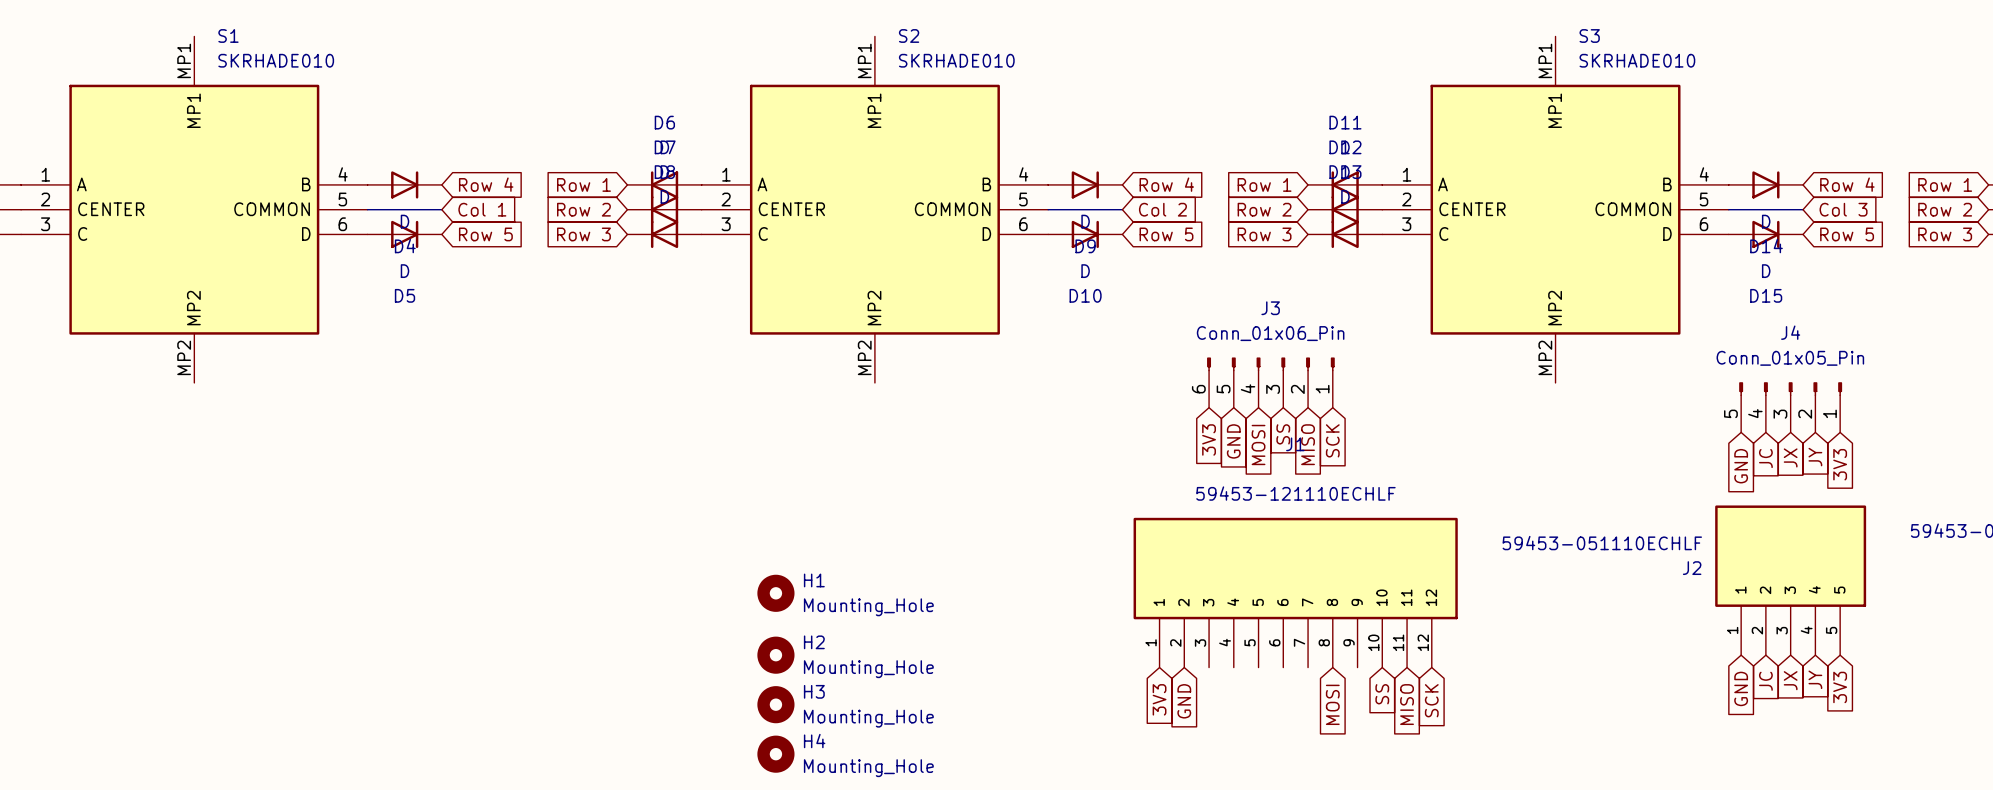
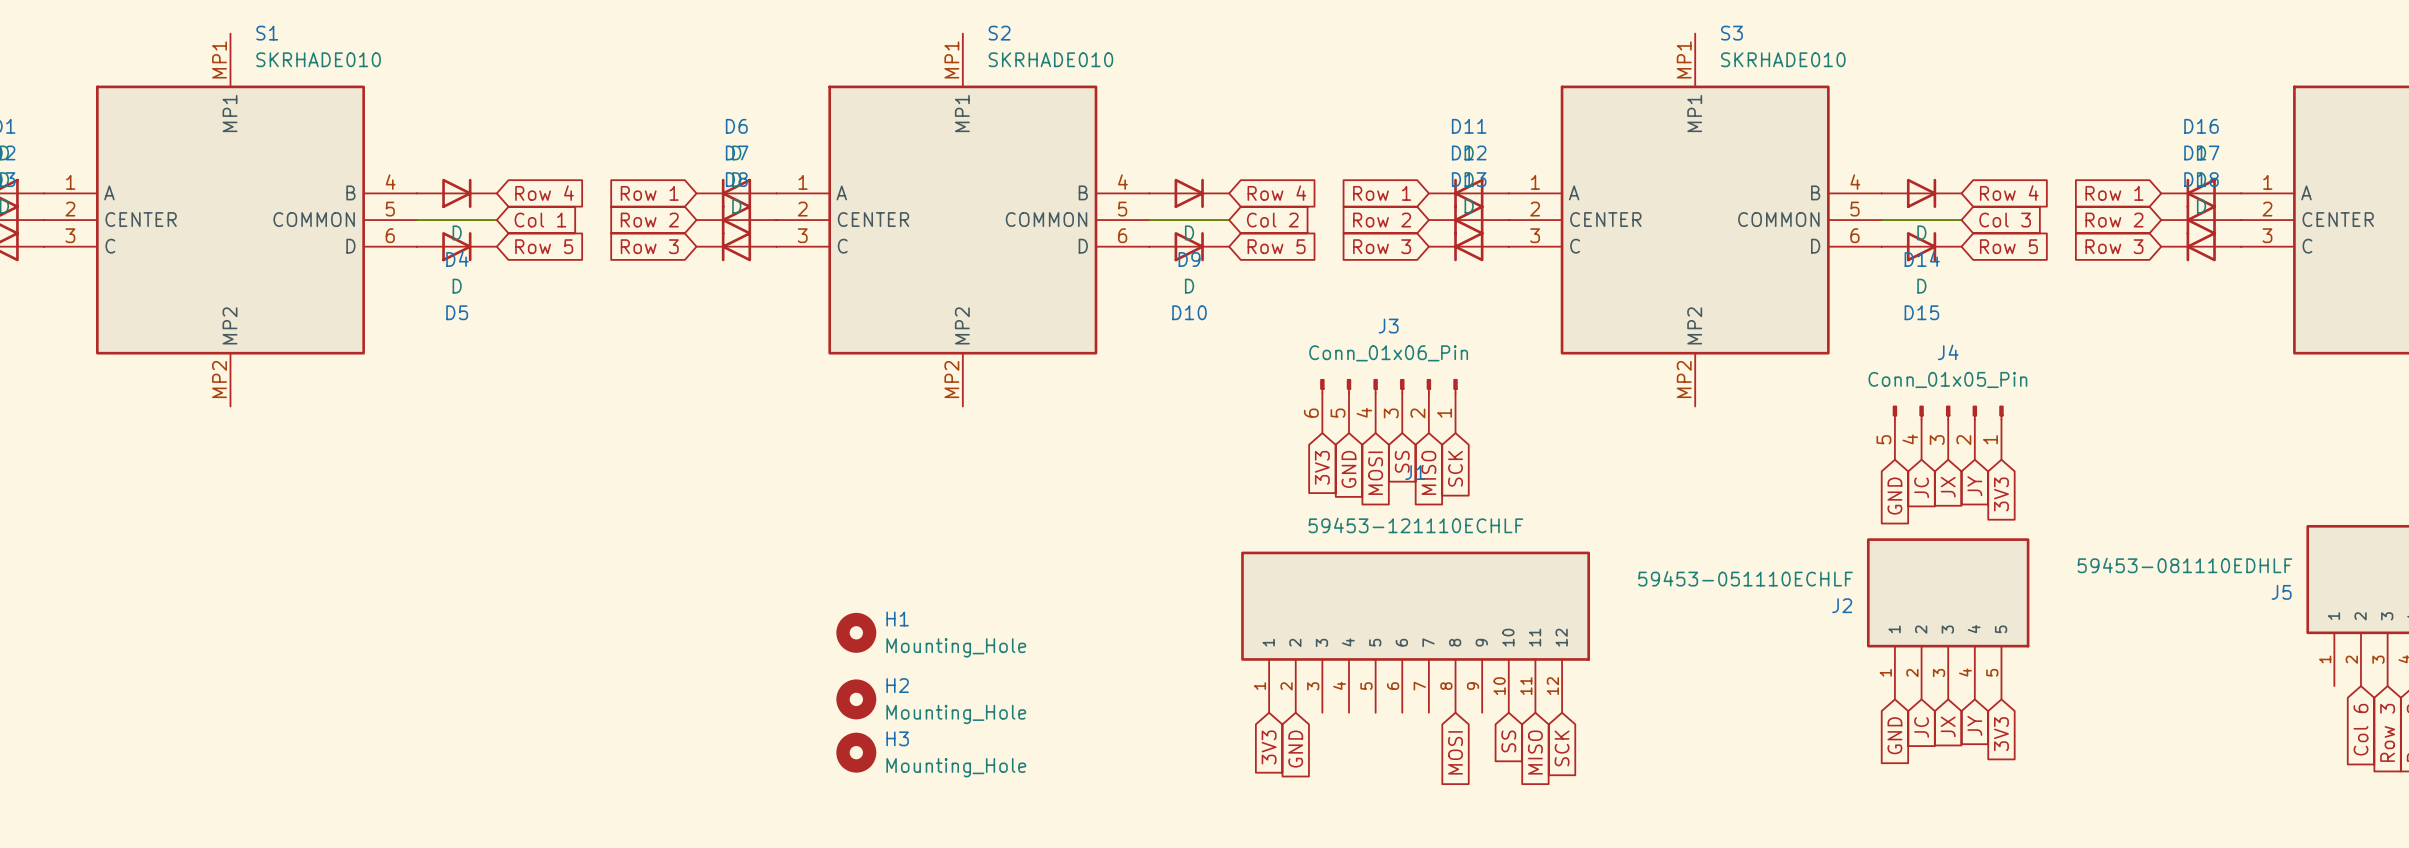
H4: Mounting_Hole (775, 754) -> none

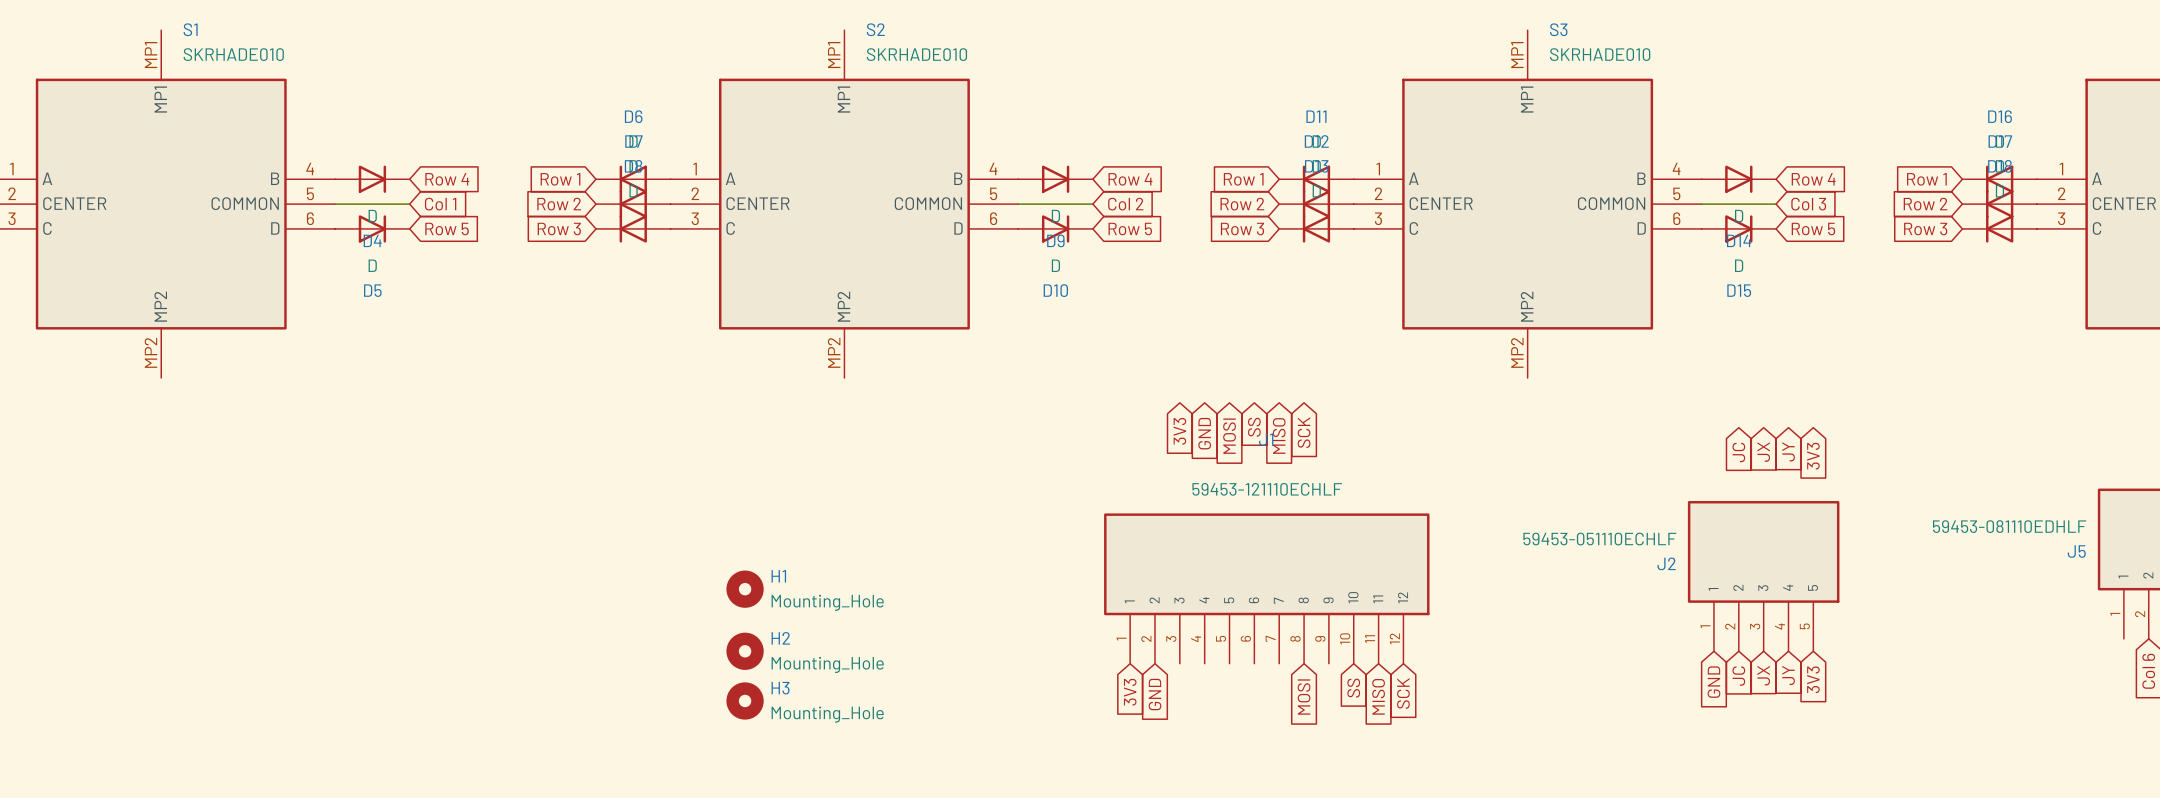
J3: Conn_01x06_Pin (1388, 406) -> none
J4: Conn_01x05_Pin (1948, 432) -> none
global label: GND (1894, 496) -> none

